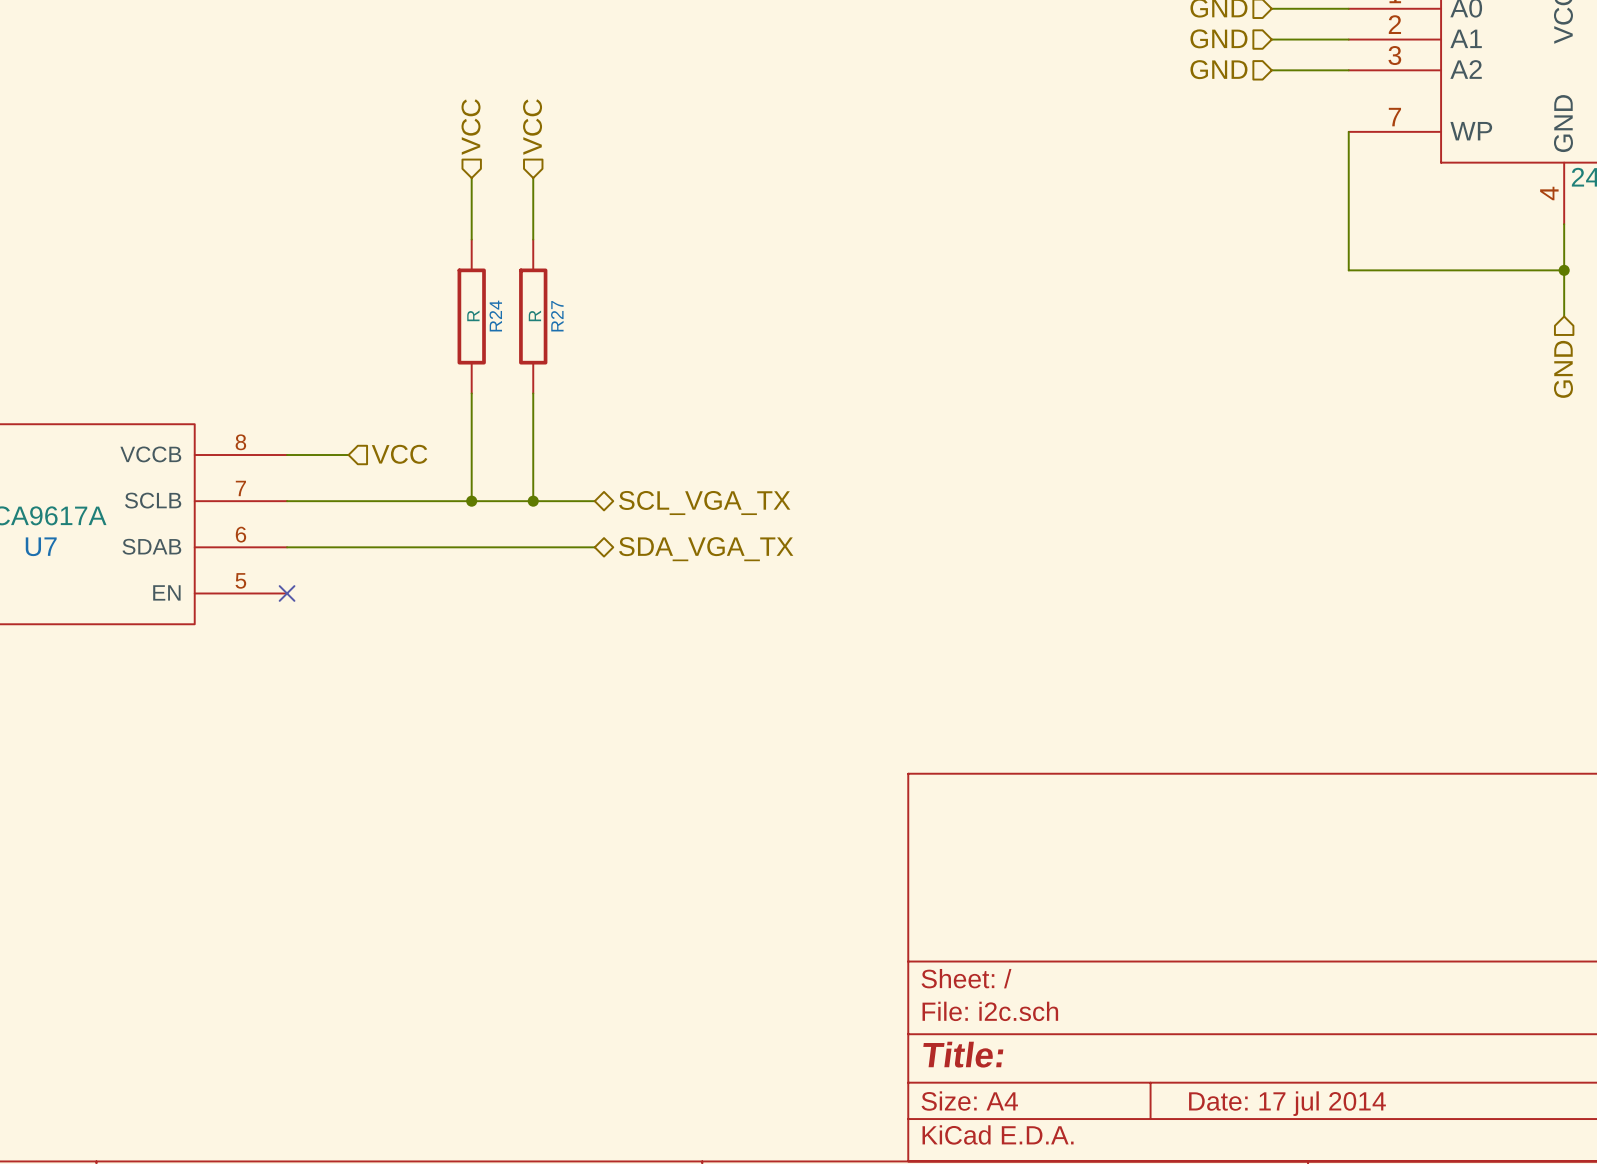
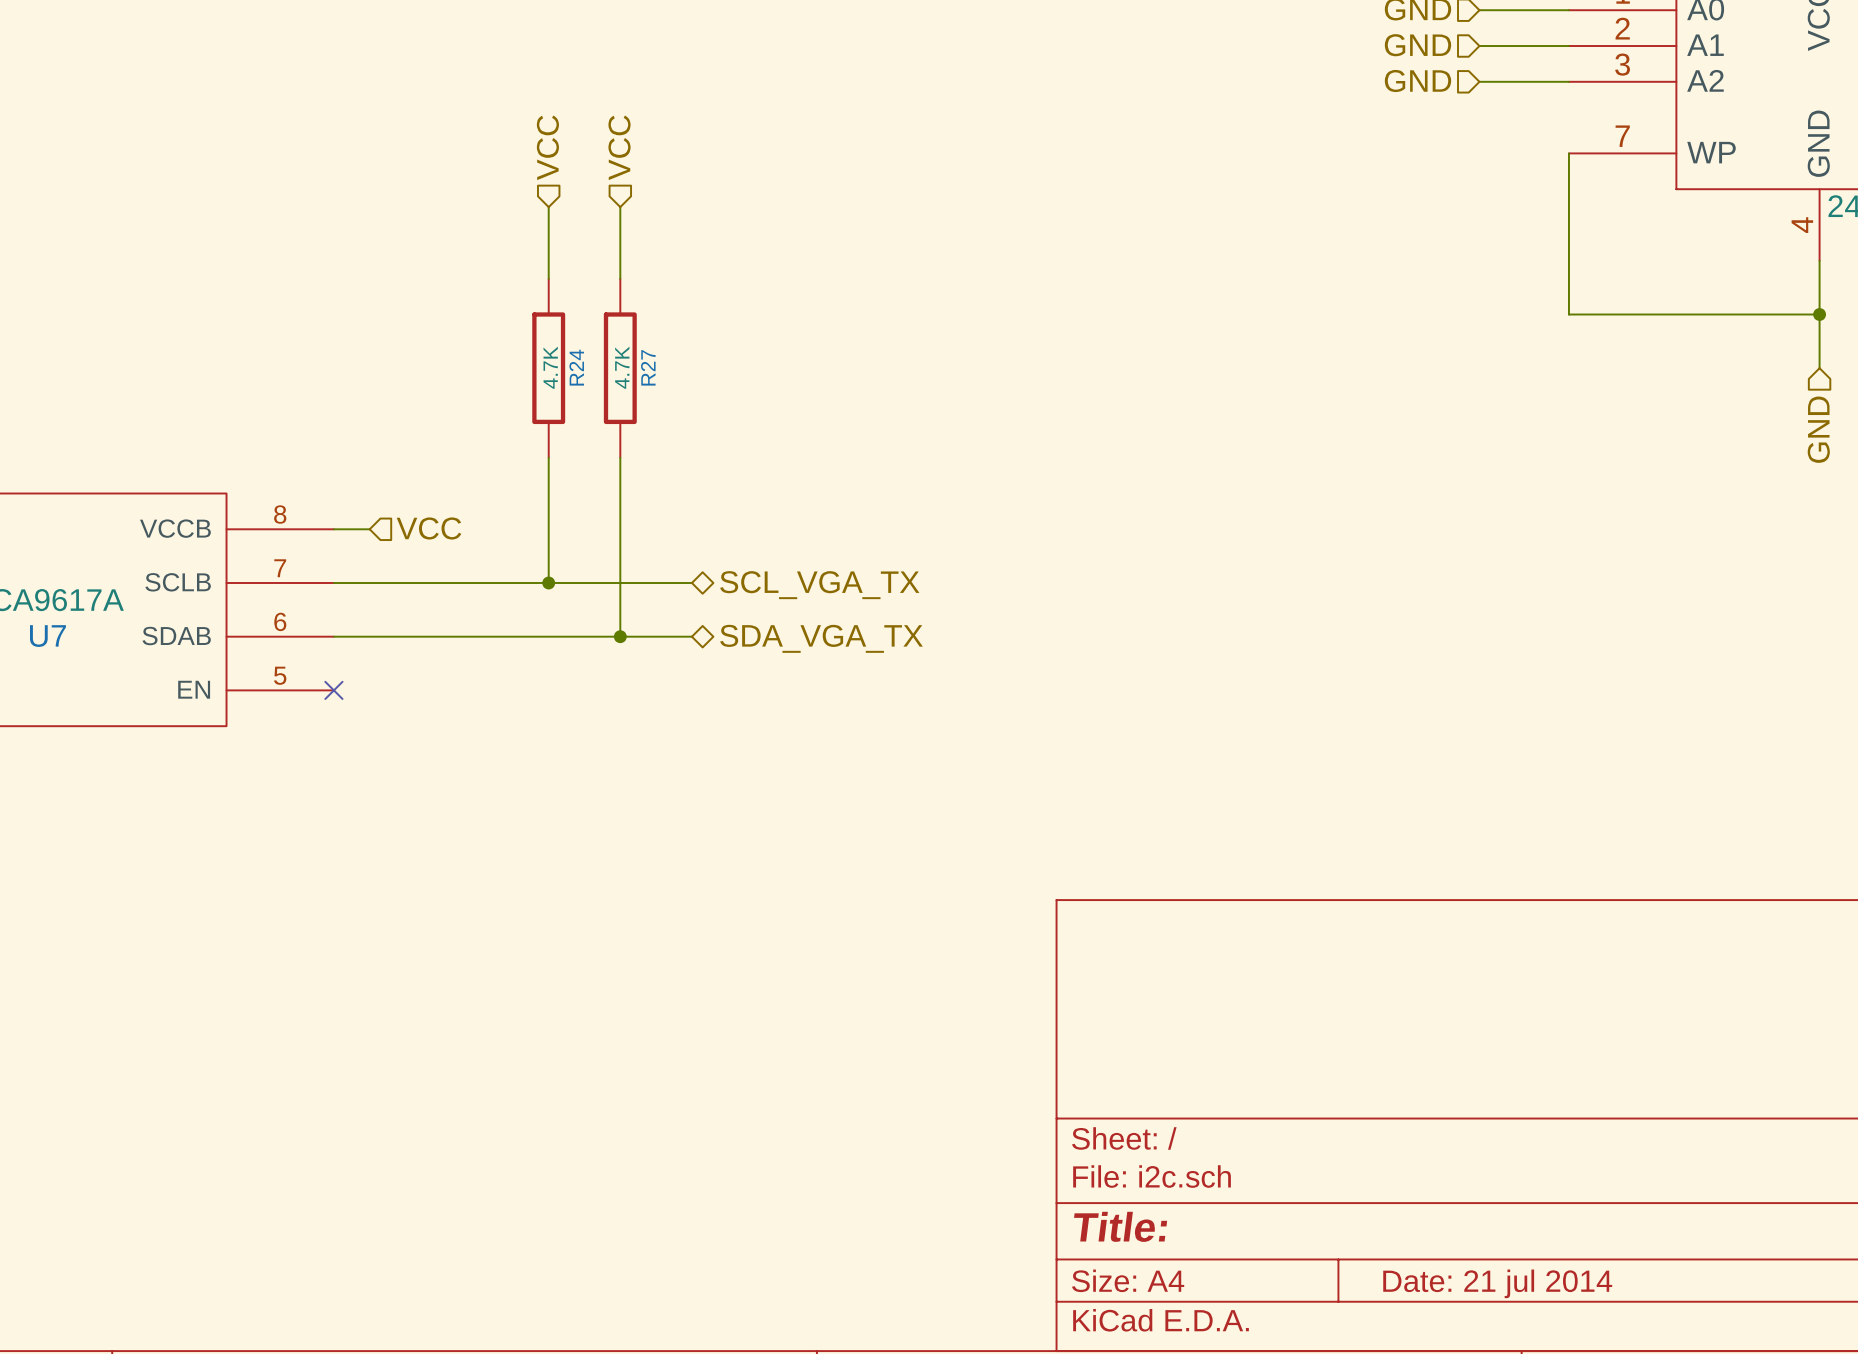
R24 value: R (473, 315) -> 4.7K (550, 367)
R27 value: R (534, 315) -> 4.7K (622, 367)
hierarchical label position: VCC (399, 454) -> VCC (429, 528)
wire: (317, 455) (348, 455) -> none
wire: none -> (620, 582) (620, 636)
junction position: (533, 501) -> (620, 636)
title block: Date: 17 jul 2014 (1287, 1103) -> Date: 21 jul 2014 (1497, 1283)

